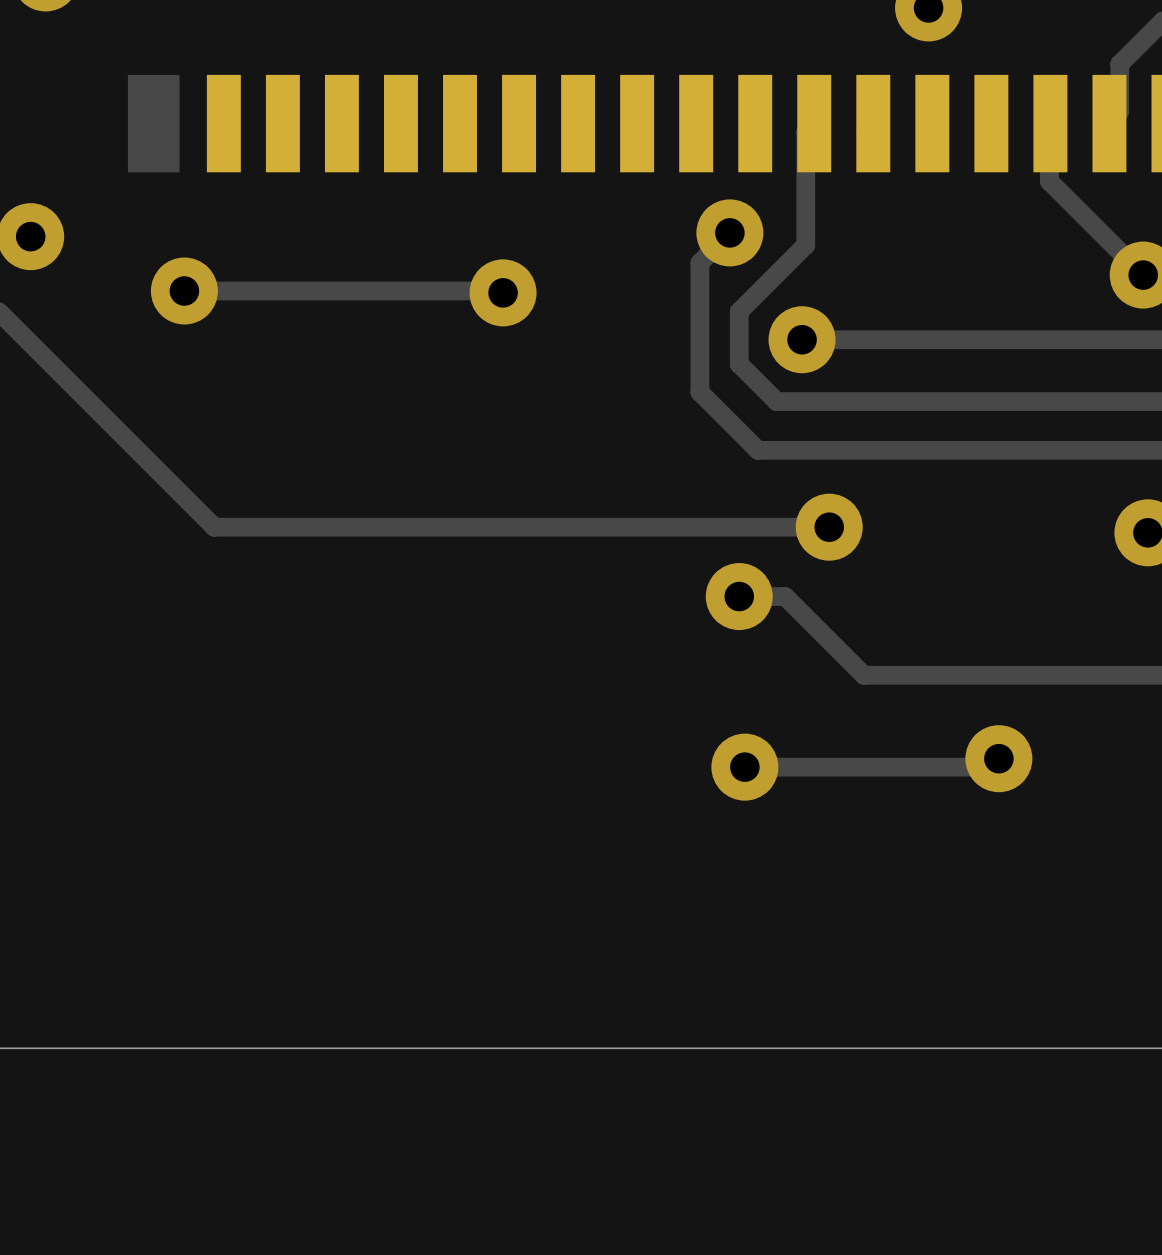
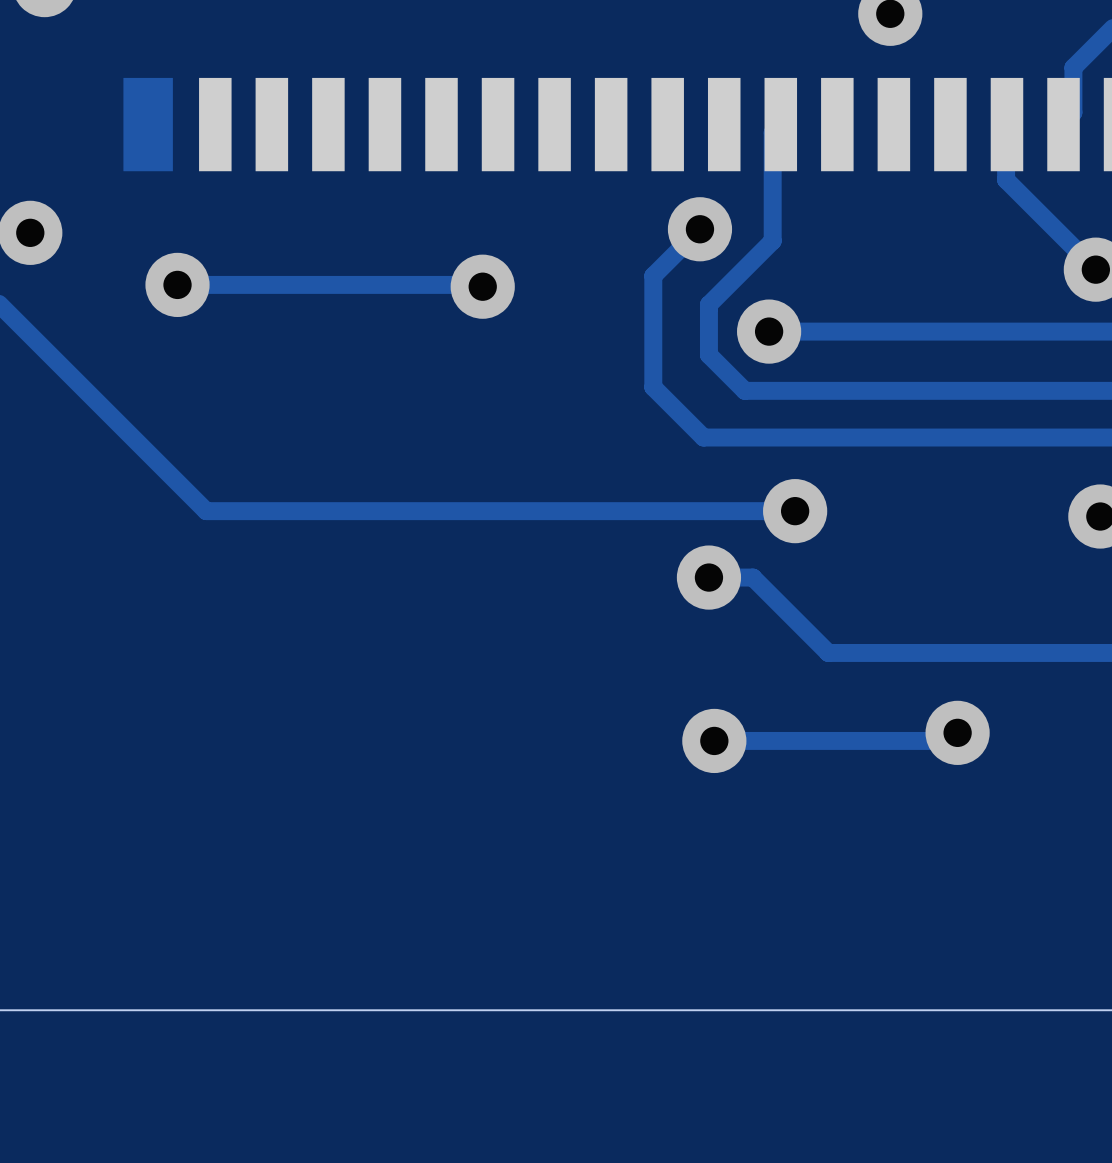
track: (699, 262) (699, 392) (758, 450) -> (671, 257) (653, 275) (653, 387) (703, 437) (726, 437)

